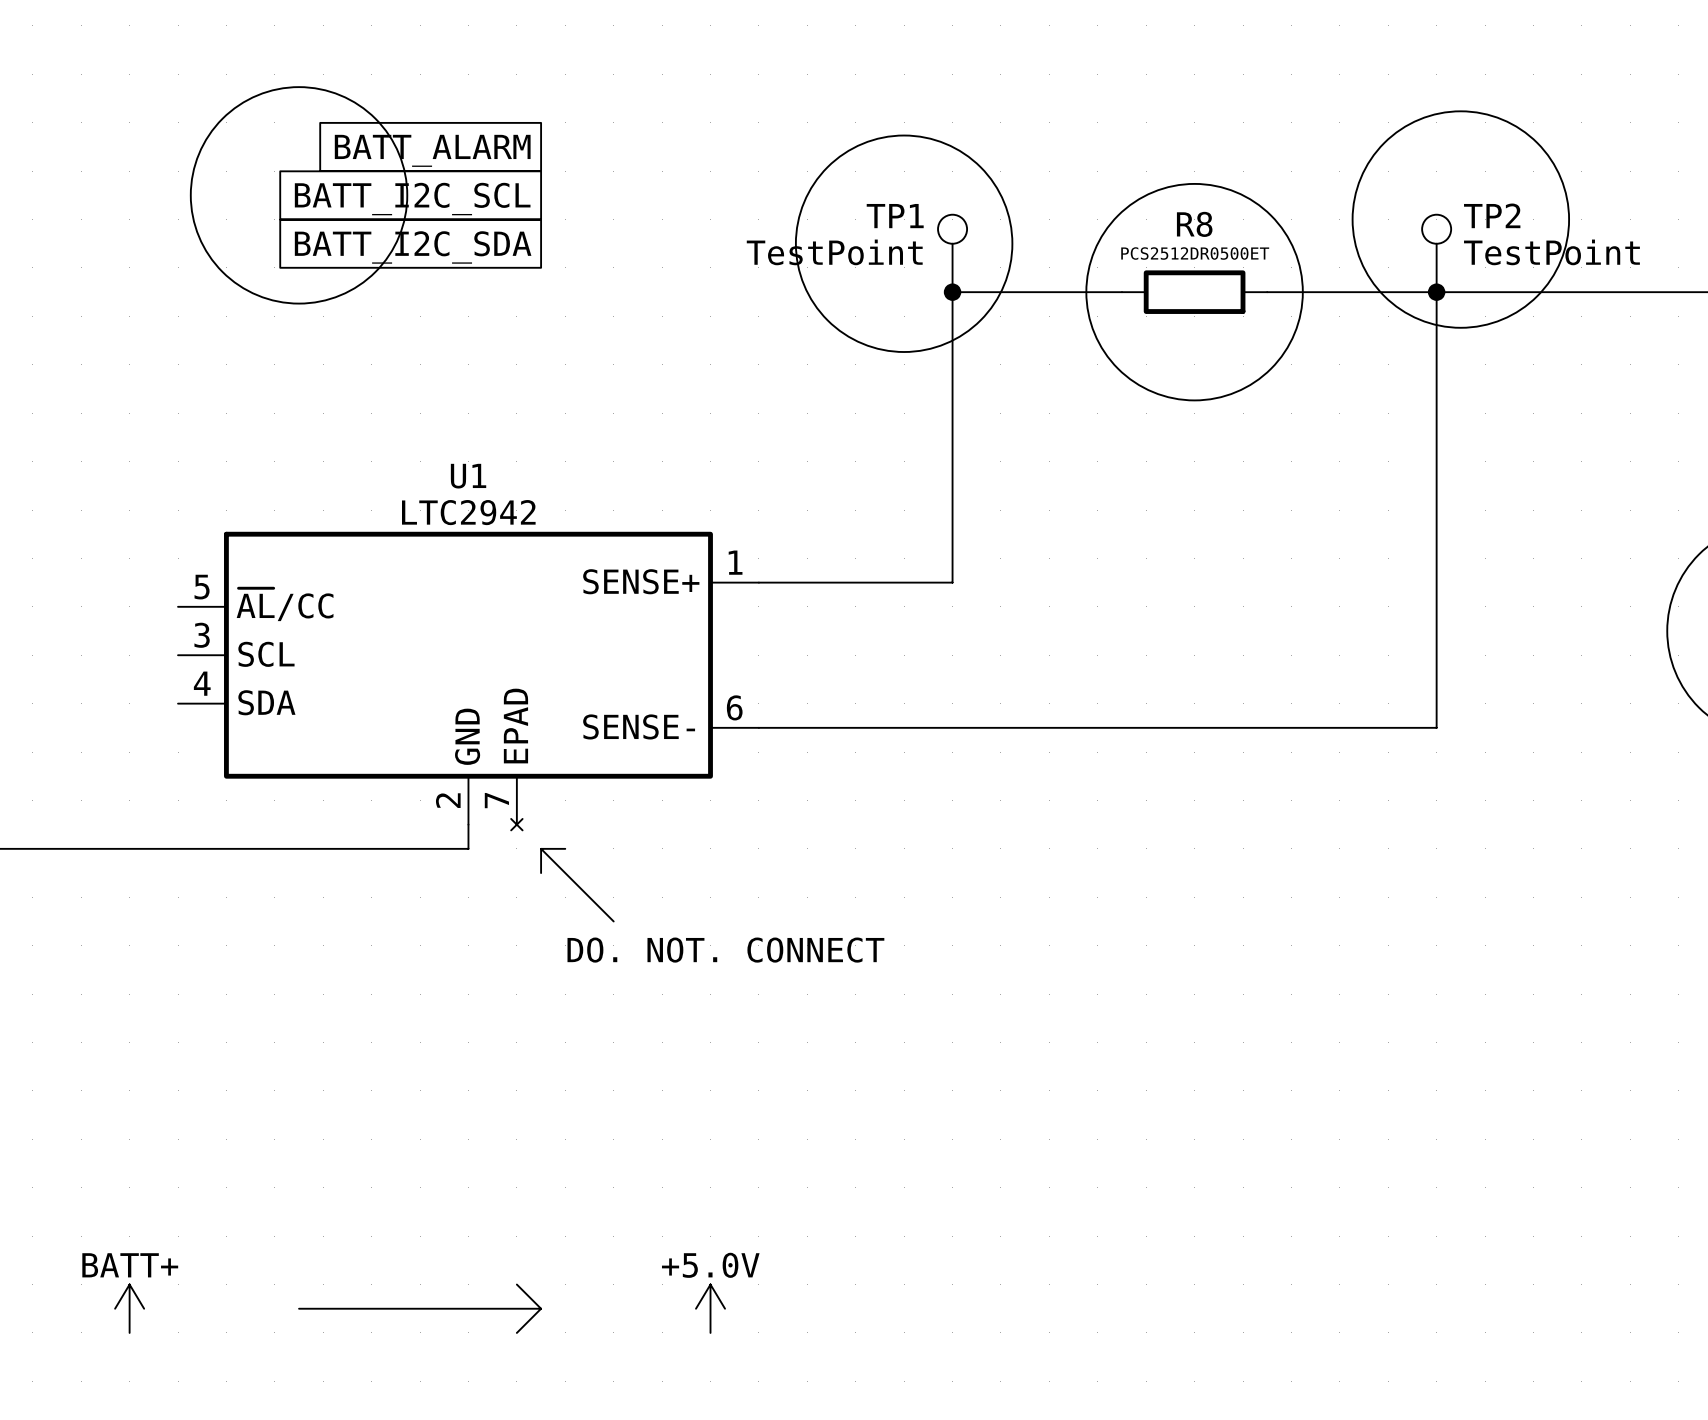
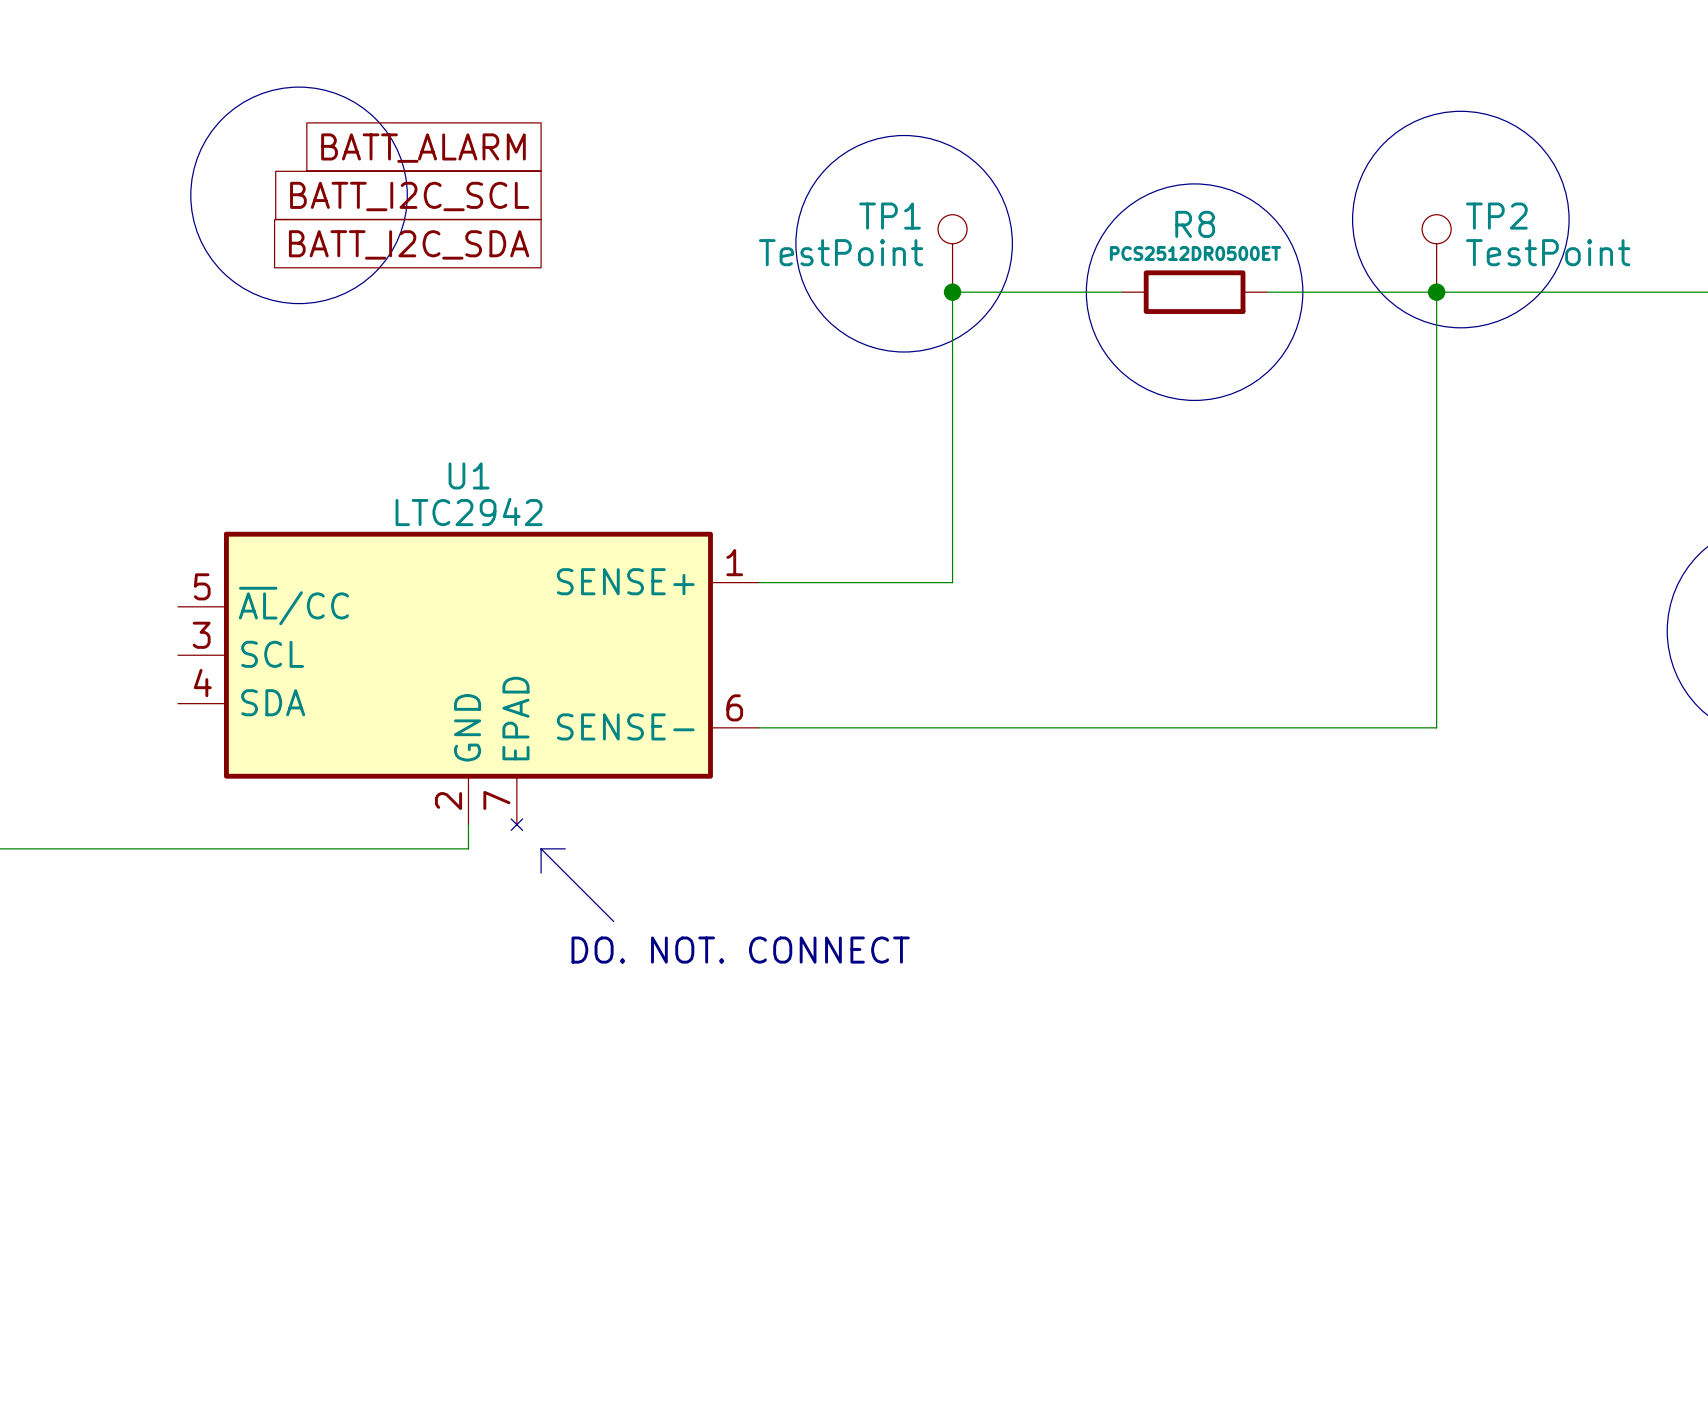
line: (516, 1284) (541, 1308) -> none
power symbol: BATT+ (129, 1308) -> none
line: (299, 1308) (541, 1308) -> none
line: (541, 1308) (516, 1332) -> none
power symbol: +5.0V (710, 1308) -> none

